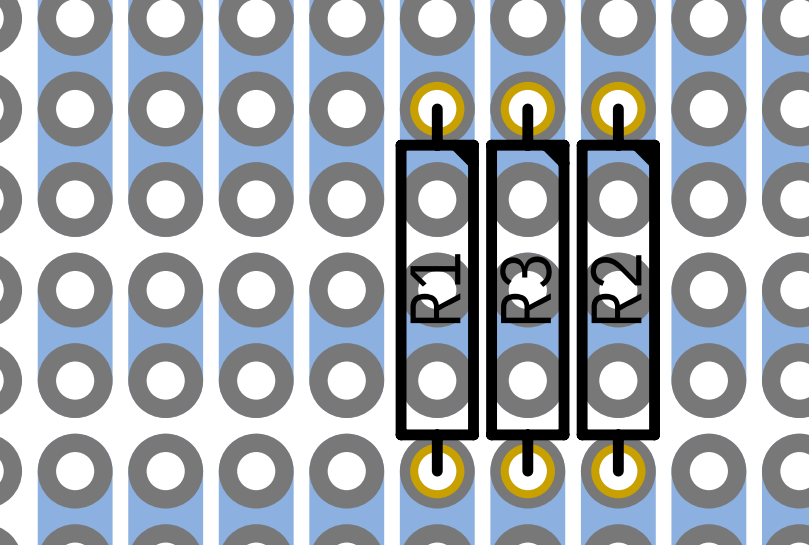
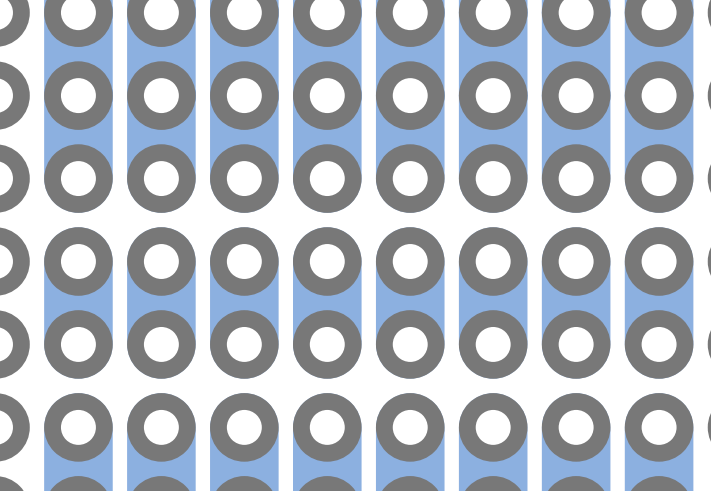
R1: (437, 290) -> none
R3: (527, 290) -> none
R2: (618, 290) -> none

